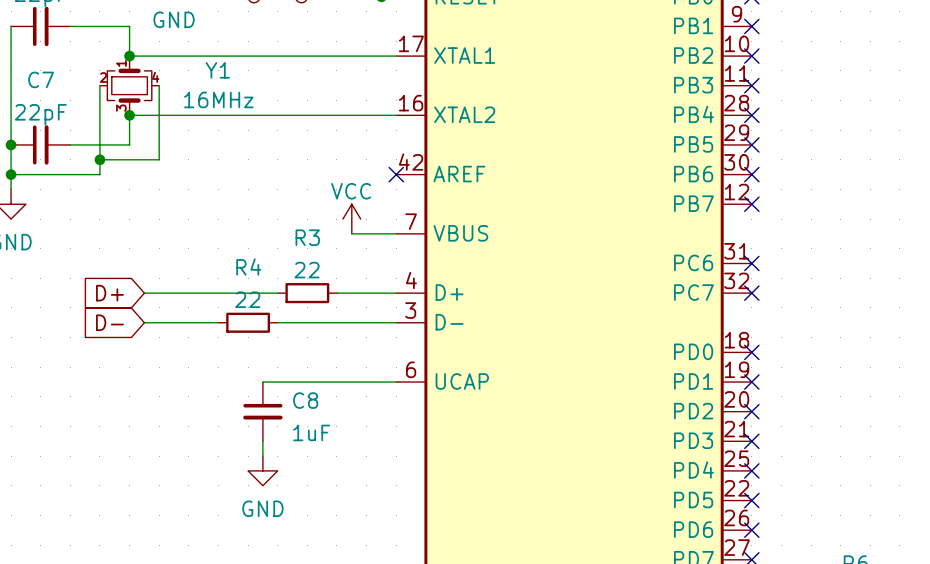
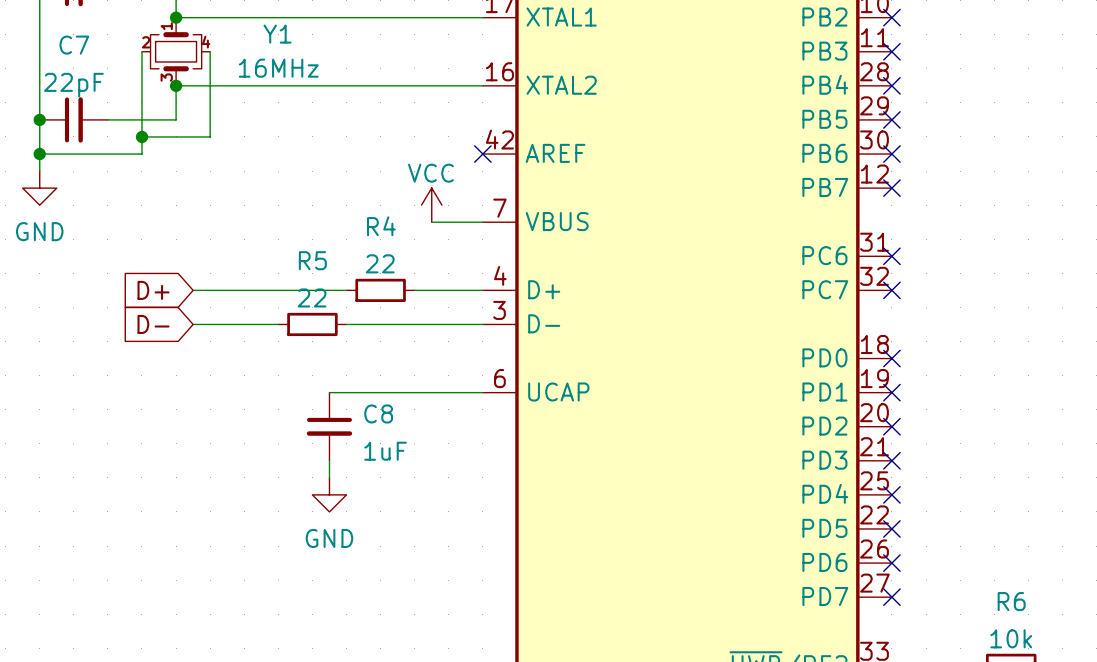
R3 name: R3 (307, 237) -> R4 (381, 226)
R4 name: R4 (248, 266) -> R5 (312, 260)

